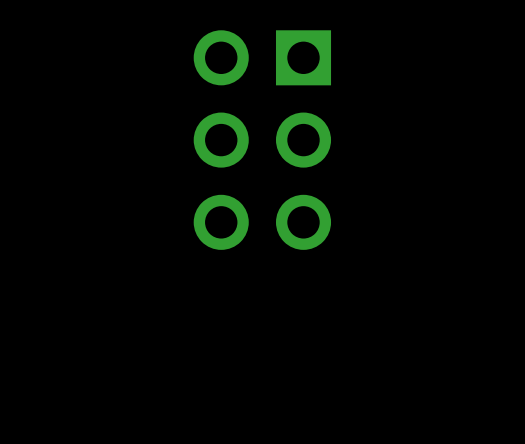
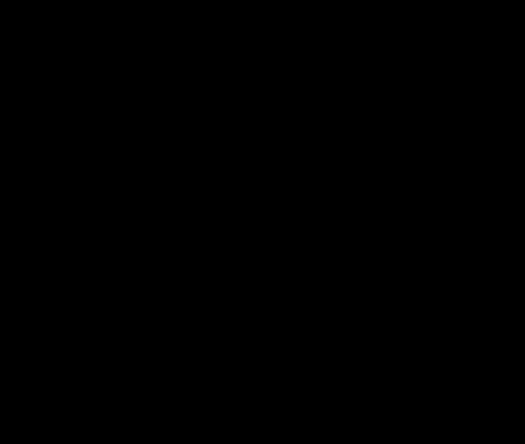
part: (262, 140) -> none

